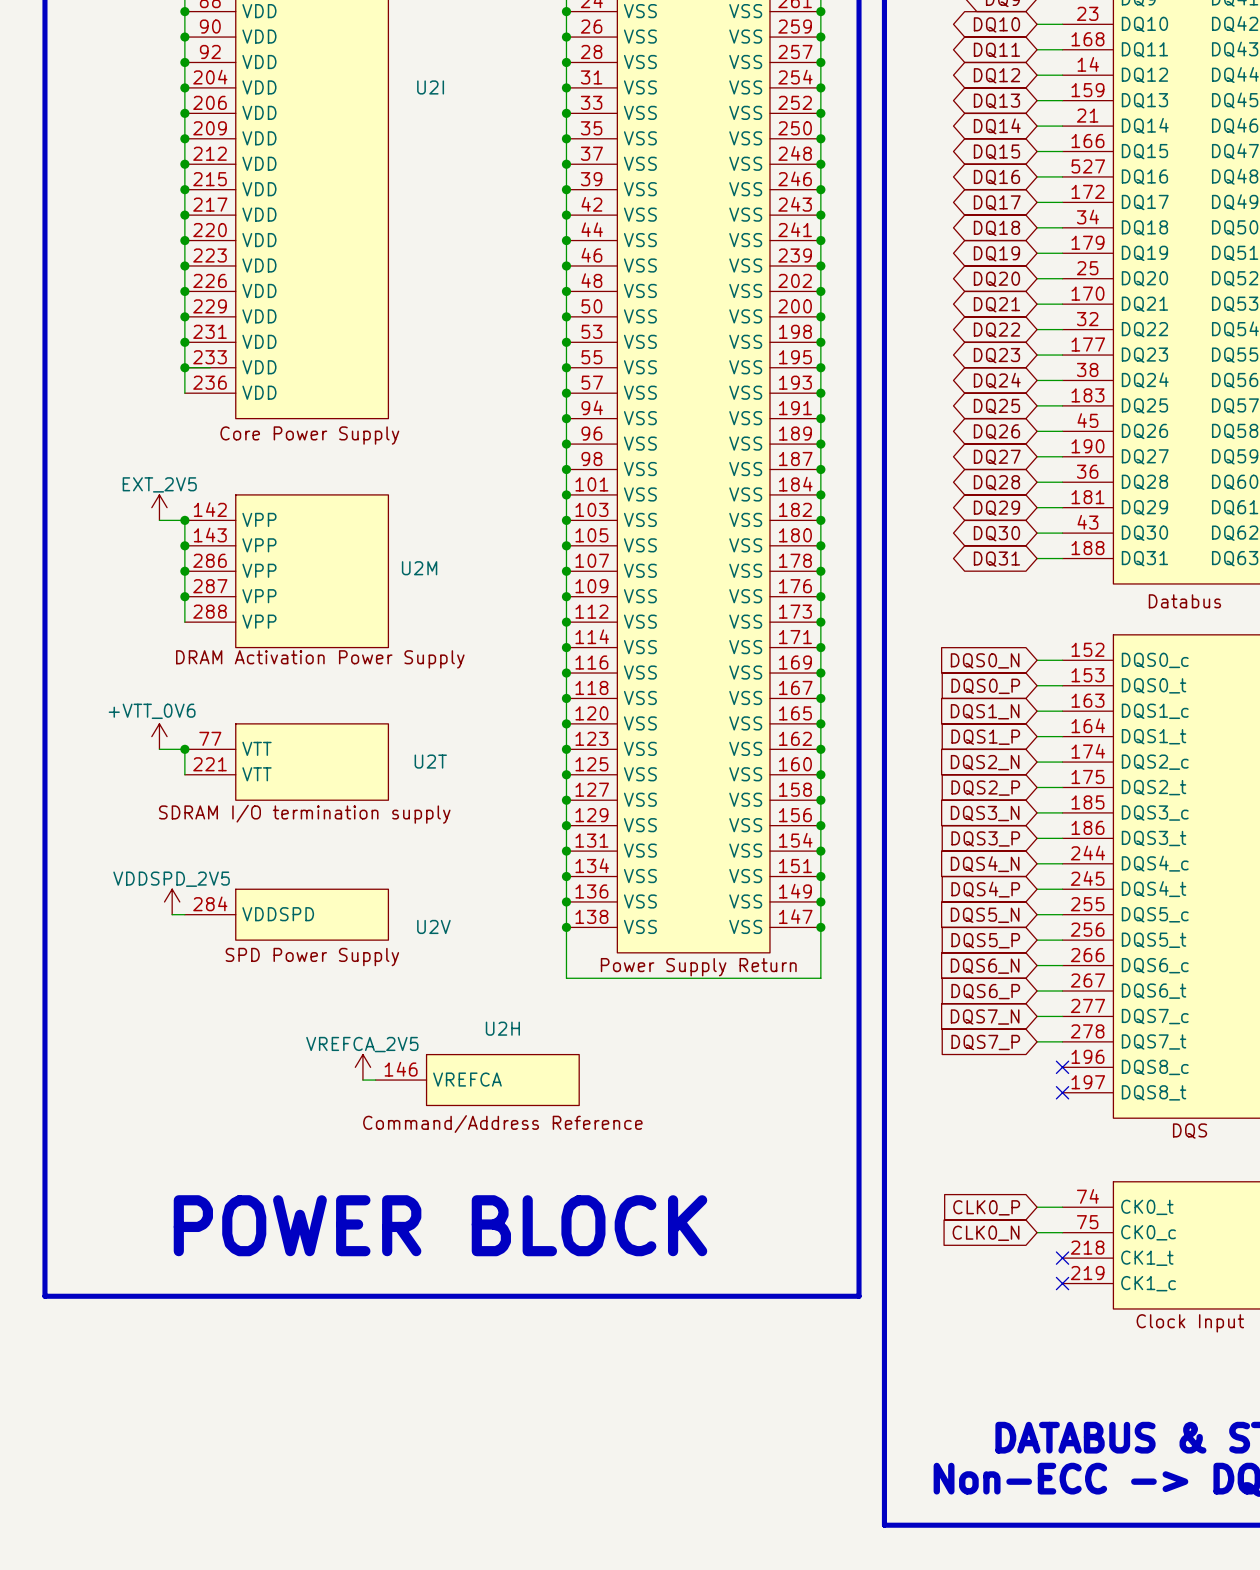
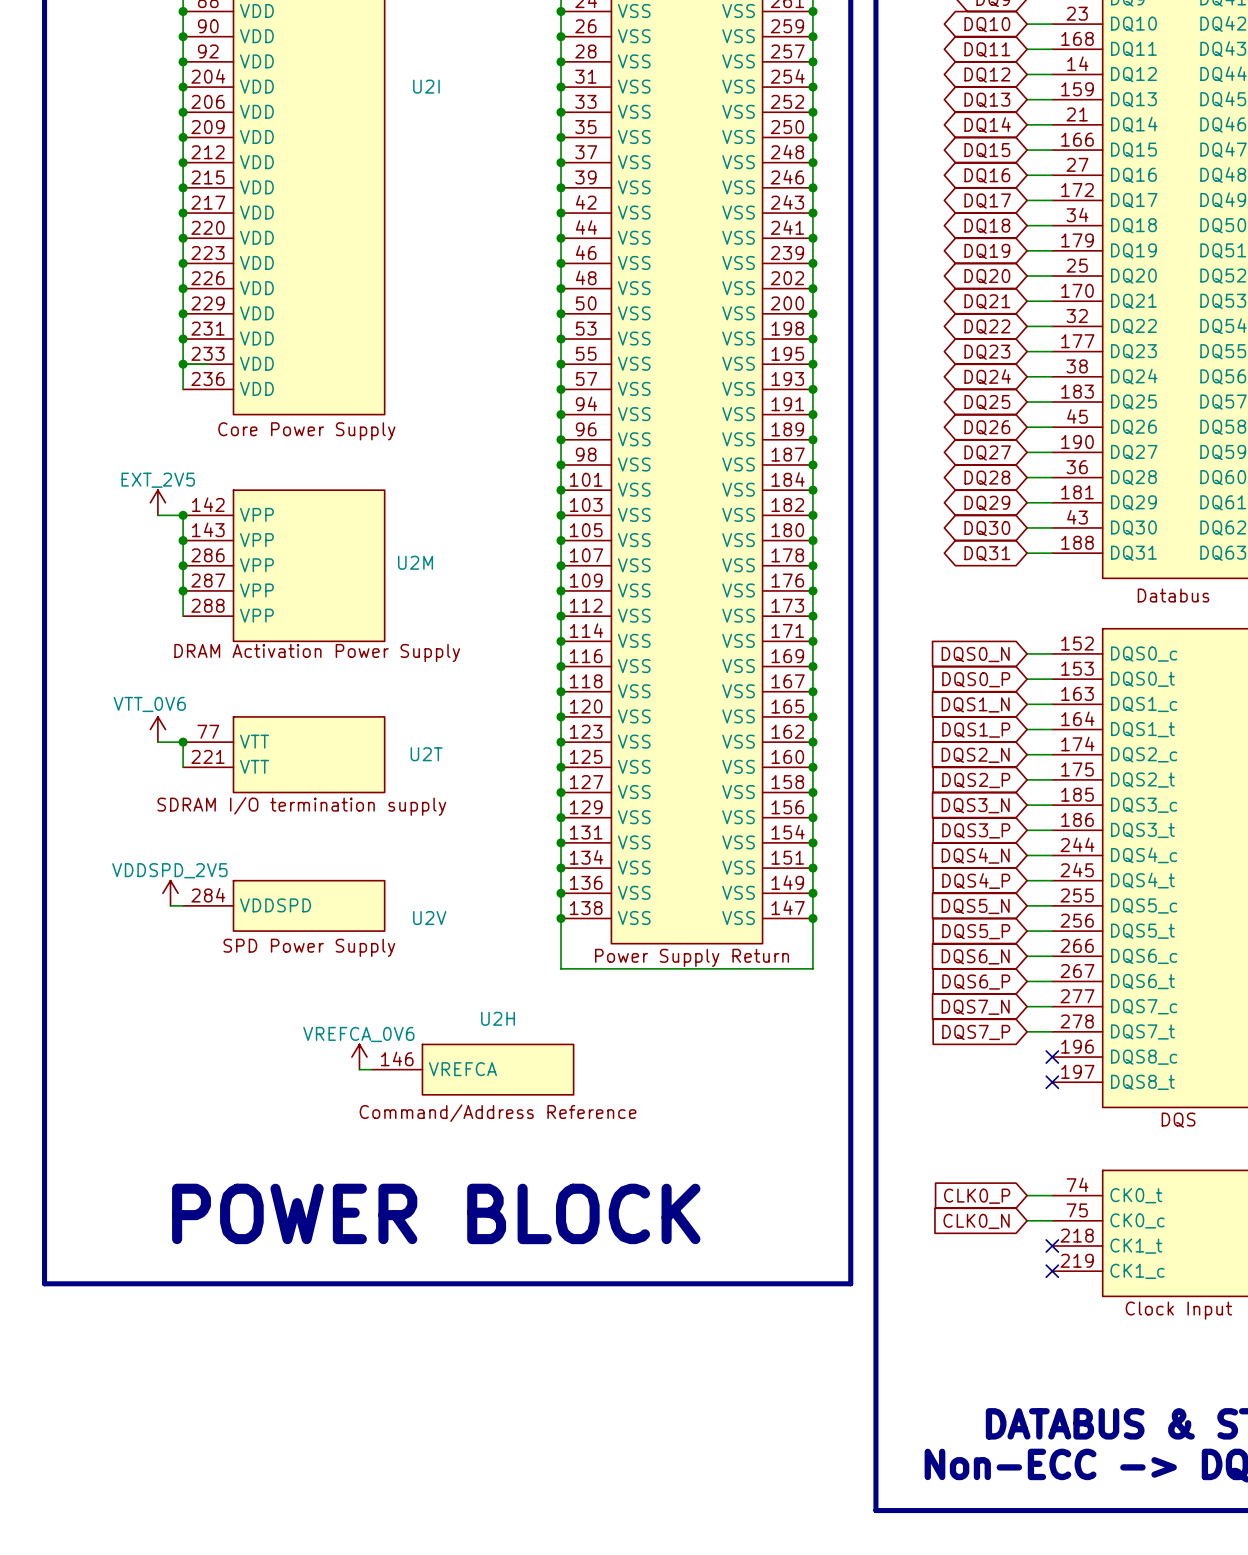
part pin number: 527 (1088, 166) -> 27 (1077, 164)
power symbol: +VTT_0V6 (159, 736) -> VTT_0V6 (157, 729)
power symbol: VREFCA_2V5 (362, 1067) -> VREFCA_0V6 (359, 1057)

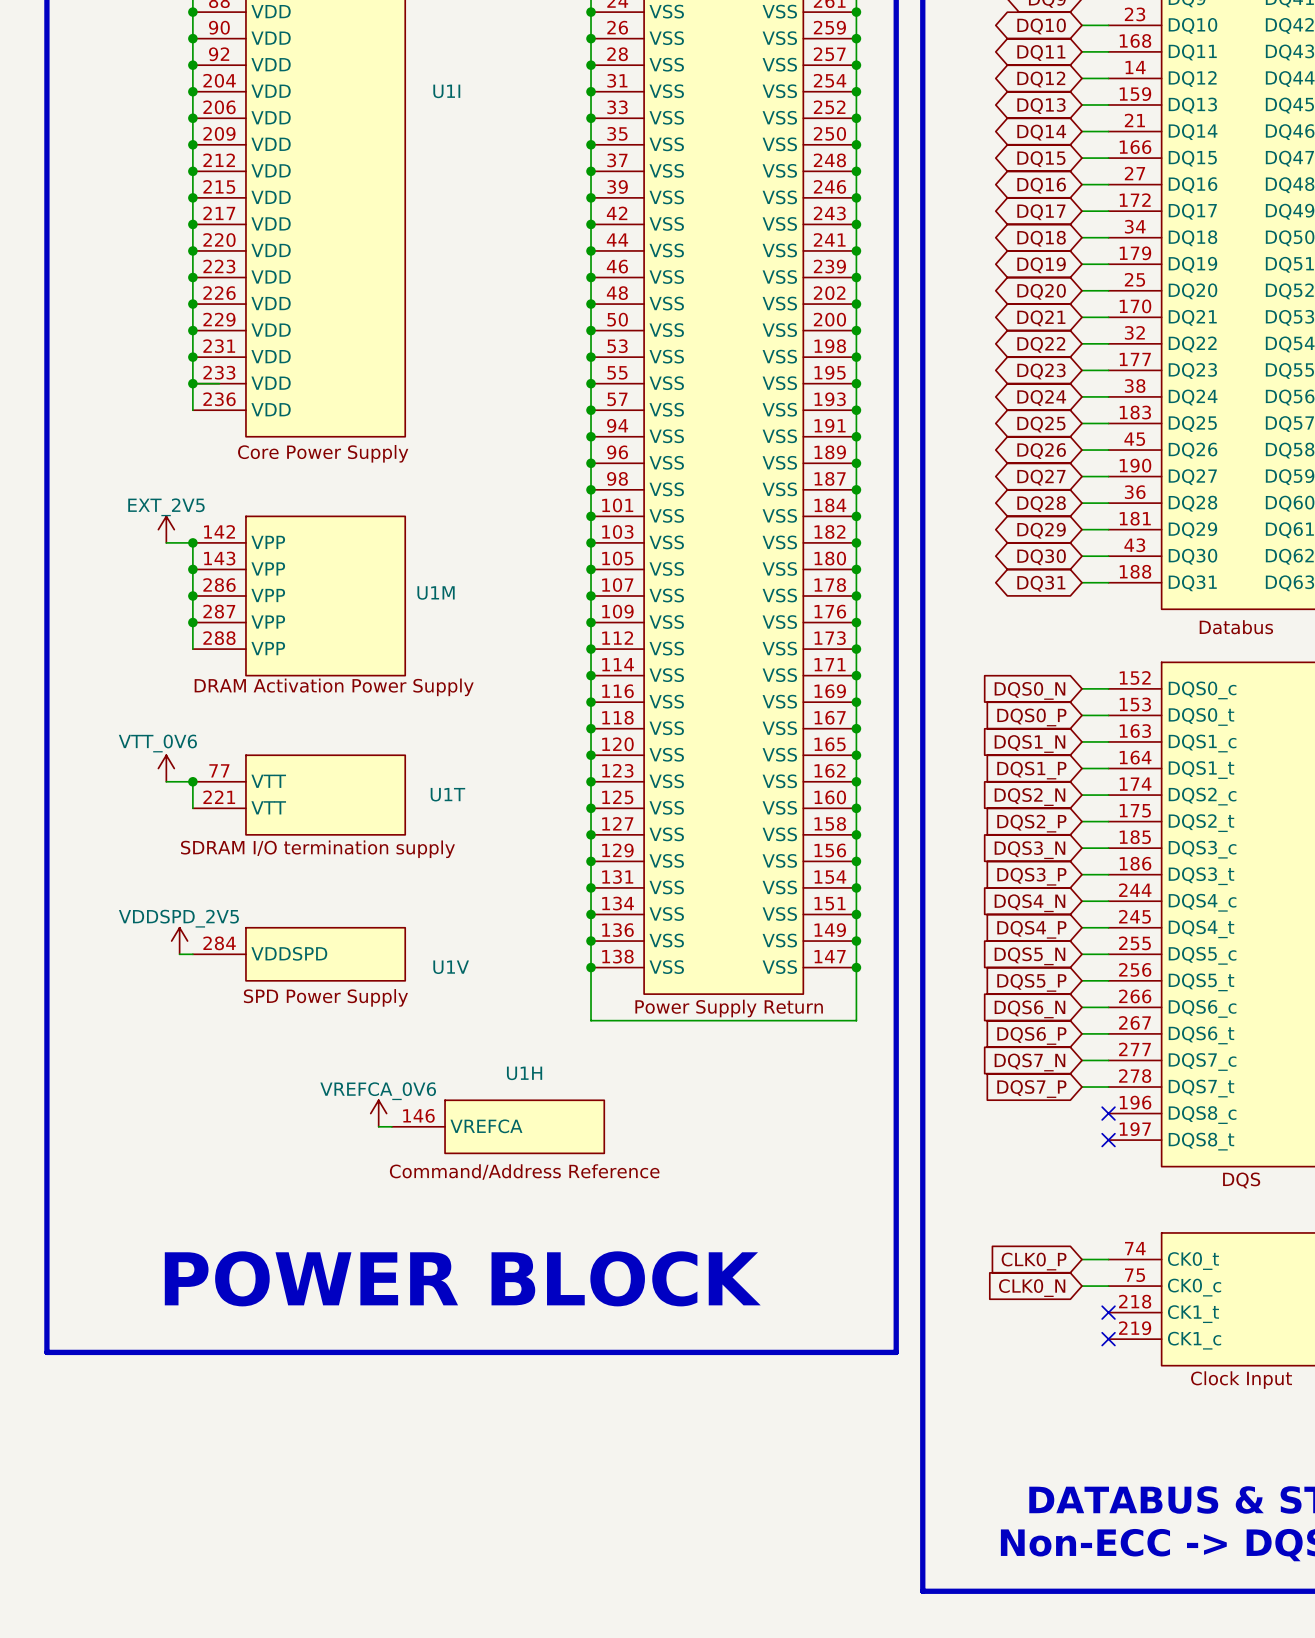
U2I name: U2I (426, 86) -> U1I (446, 91)
U2M name: U2M (415, 562) -> U1M (436, 592)
U2T name: U2T (426, 754) -> U1T (447, 794)
U2V name: U2V (429, 918) -> U1V (451, 967)
U2H name: U2H (498, 1018) -> U1H (524, 1073)

